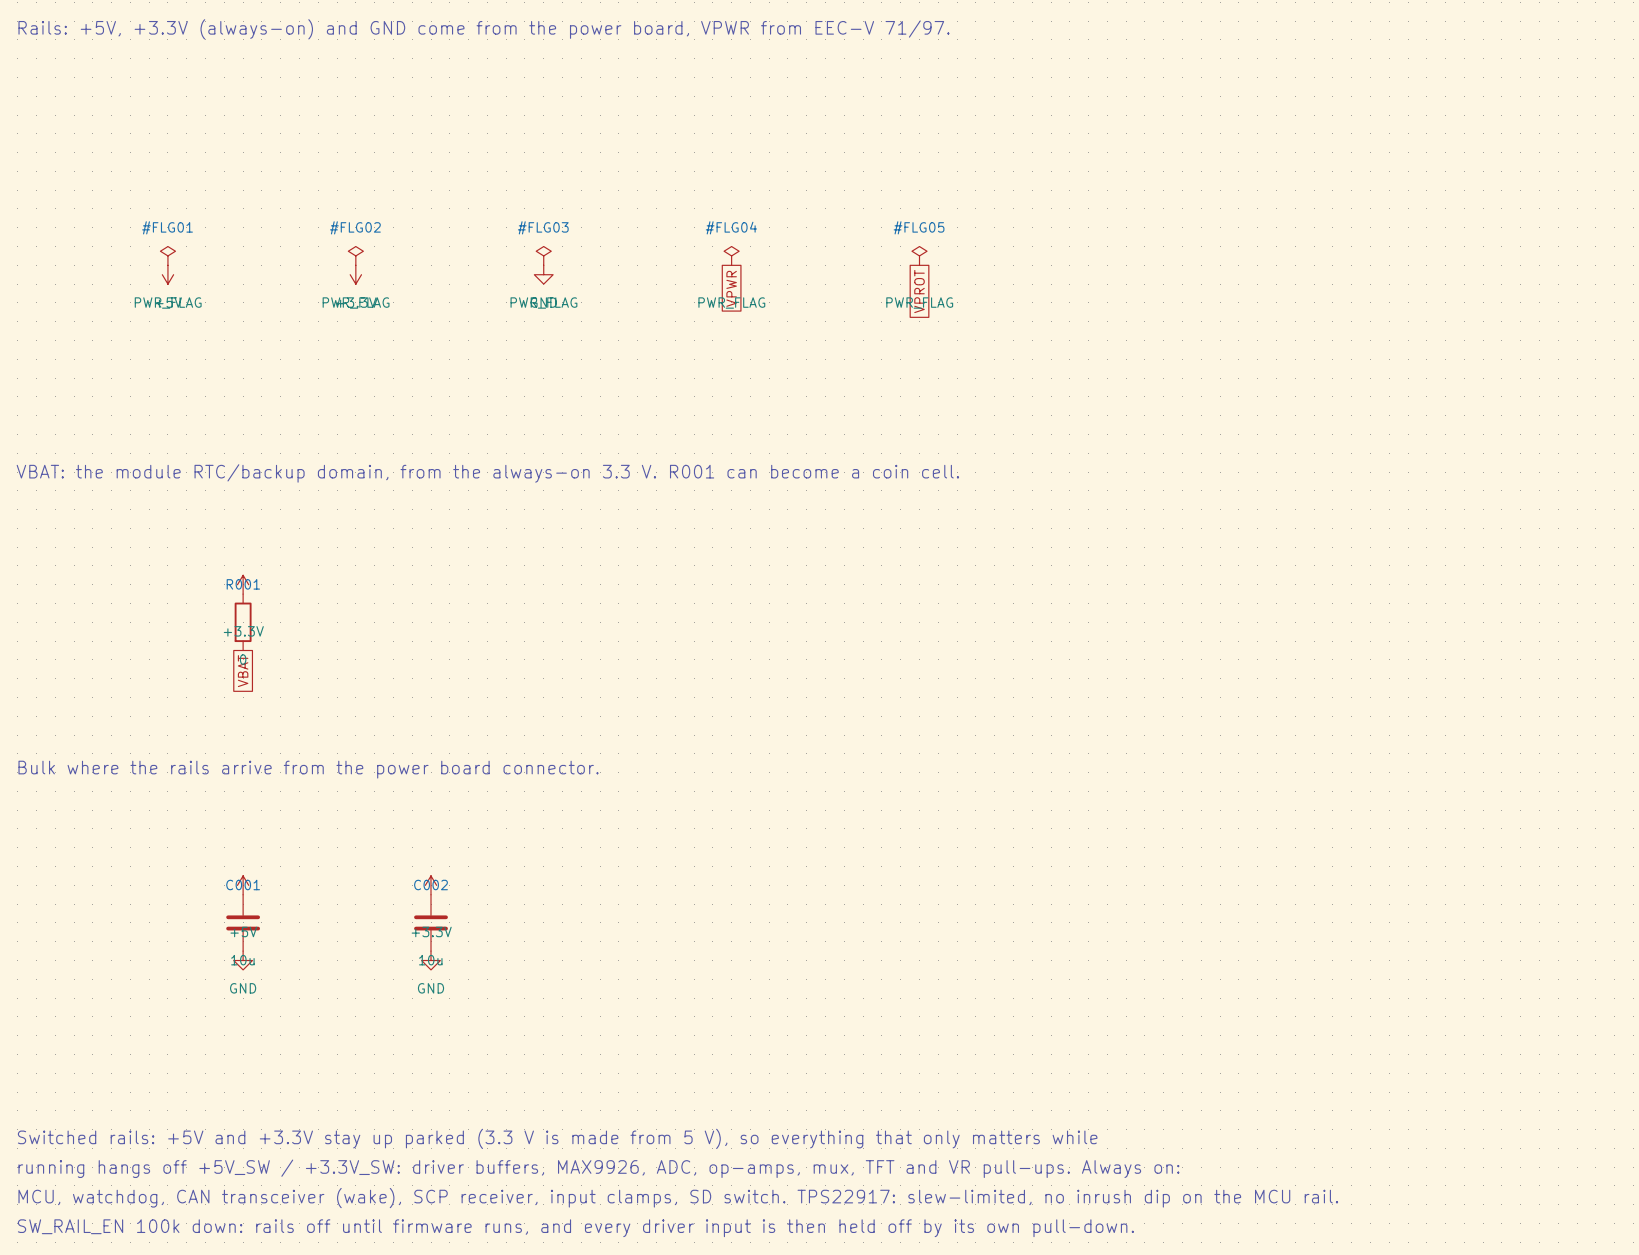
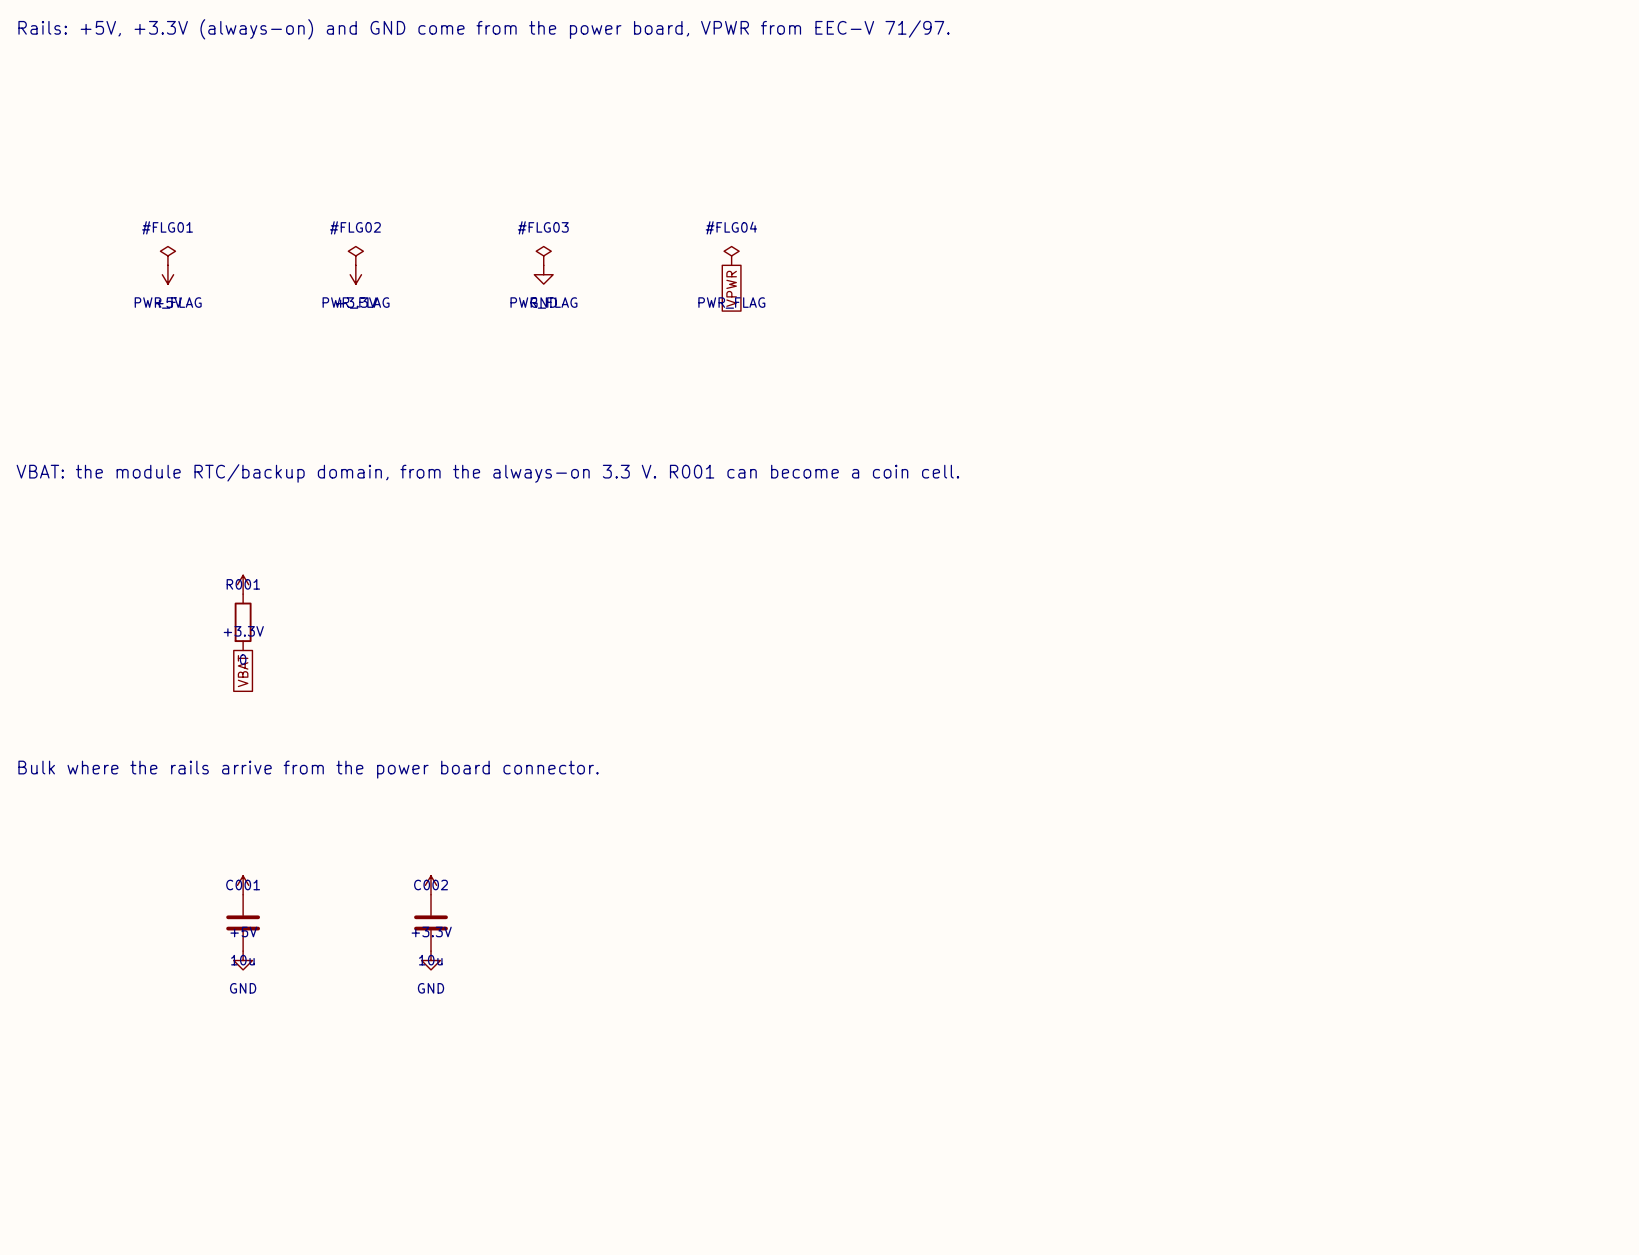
#FLG05: PWR_FLAG (919, 255) -> none
global label: VPROT (919, 291) -> none
text: Switched rails: +5V and +3.3V stay up parked (3.3 V is made from 5 V), so everything that only matters while (557, 1138) -> none
text: running hangs off +5V_SW / +3.3V_SW: driver buffers, MAX9926, ADC, op-amps, mux, TFT and VR pull-ups. Always on: (598, 1168) -> none
text: MCU, watchdog, CAN transceiver (wake), SCP receiver, input clamps, SD switch. TPS22917: slew-limited, no inrush dip on the MCU rail. (678, 1198) -> none
text: SW_RAIL_EN 100k down: rails off until firmware runs, and every driver input is then held off by its own pull-down. (575, 1228) -> none

